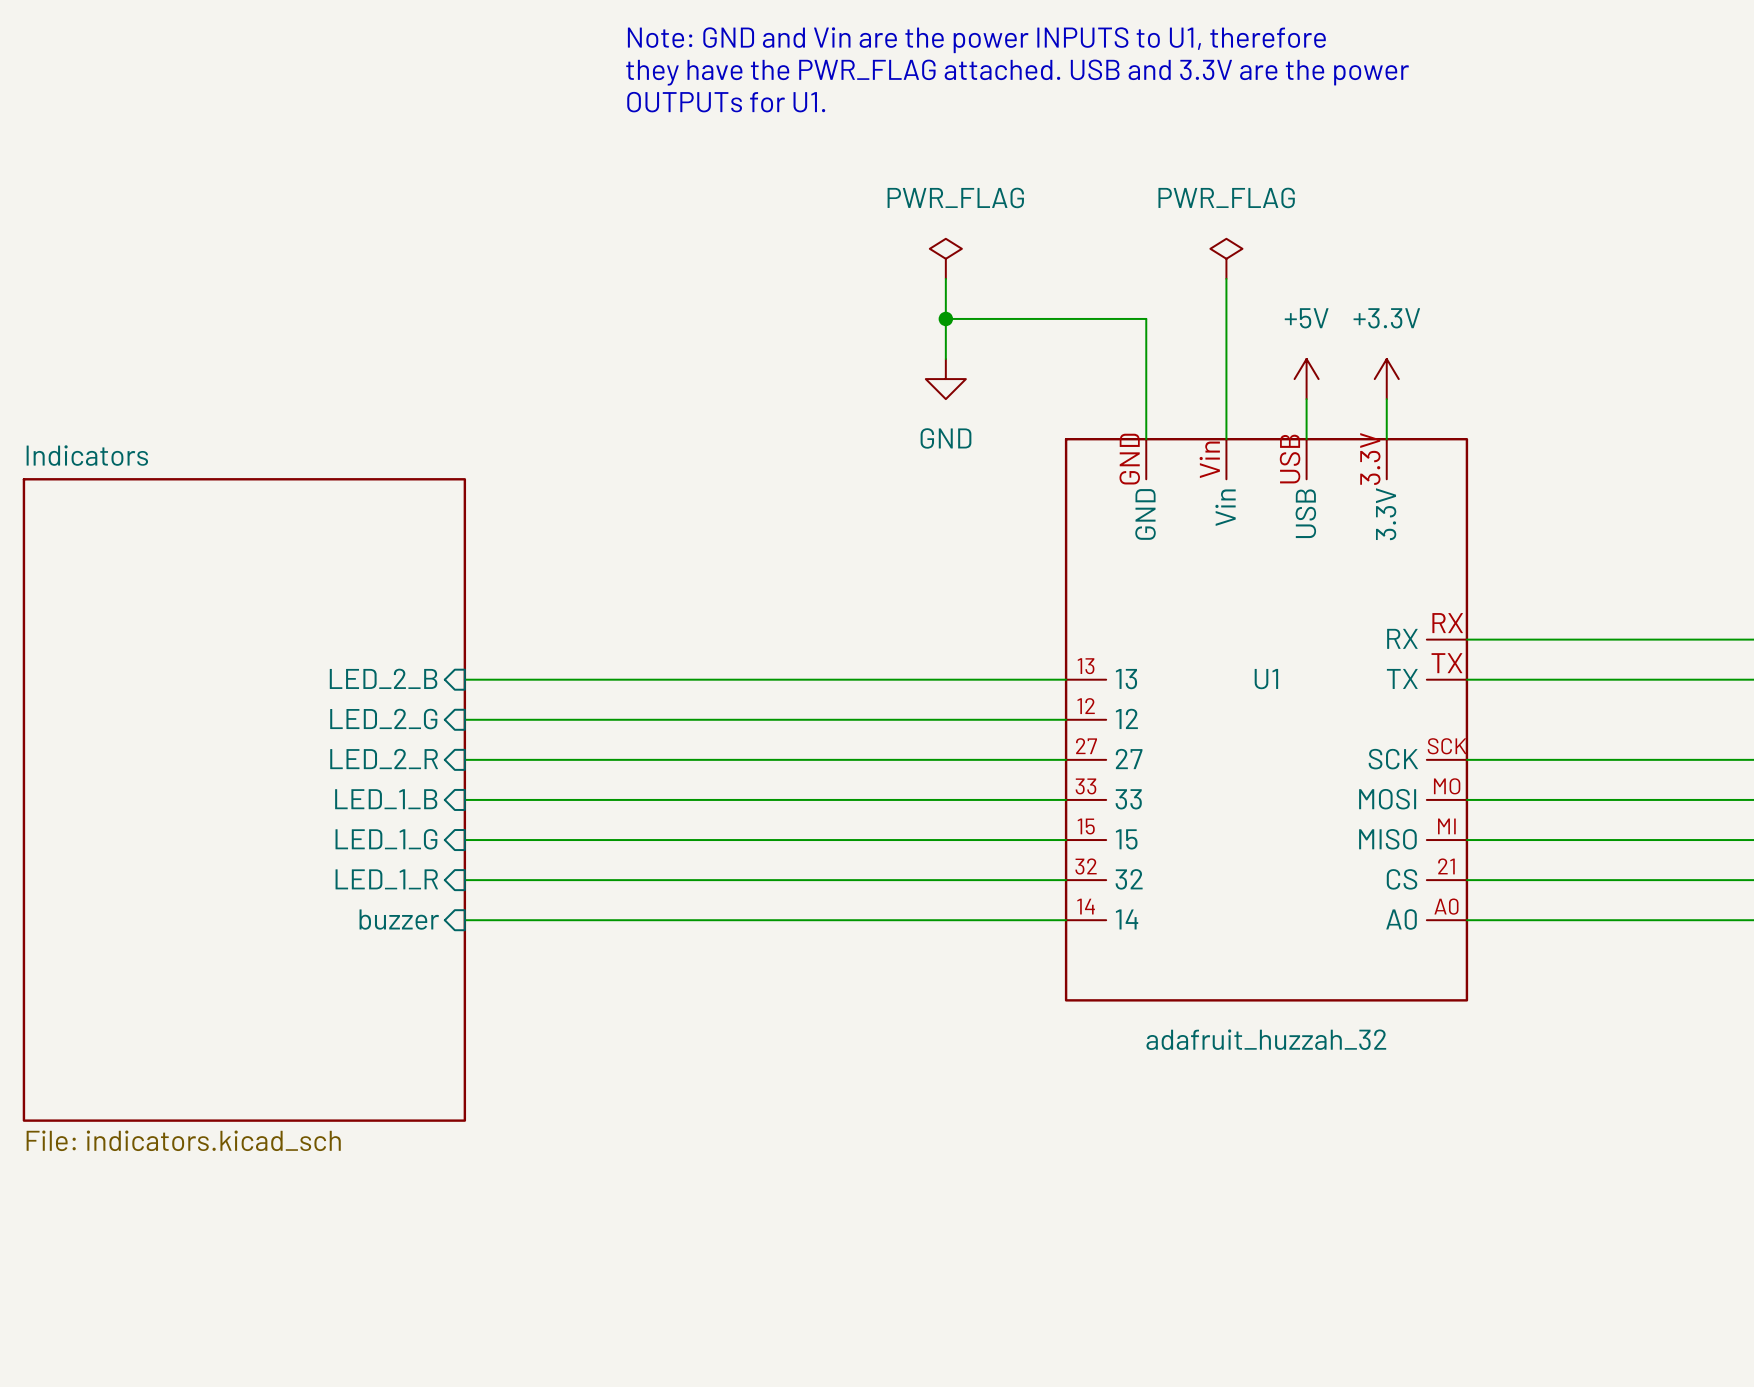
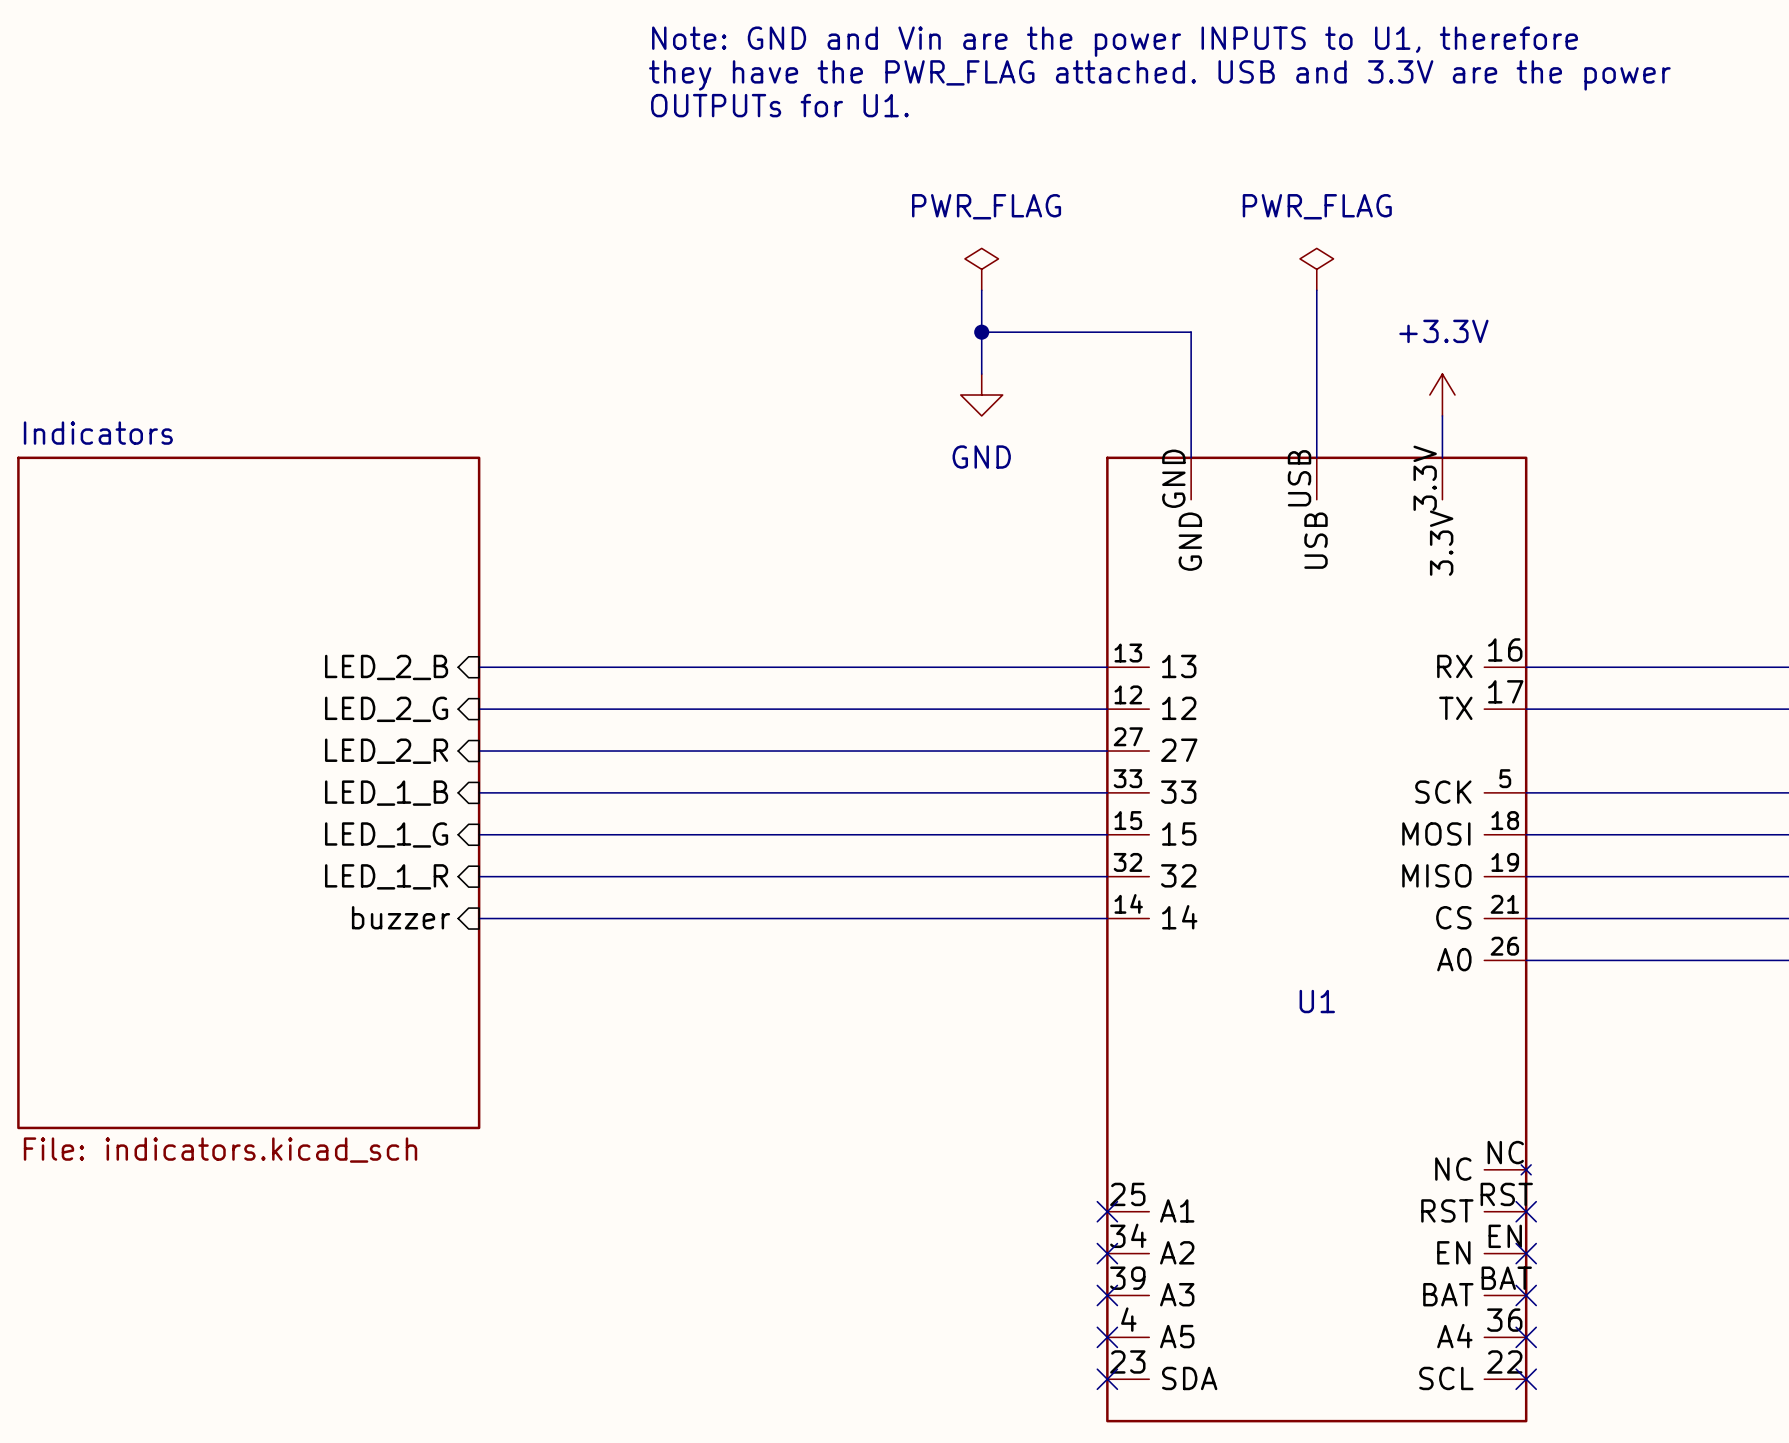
power symbol position: PWR_FLAG (1226, 258) -> PWR_FLAG (1316, 269)
wire: (1226, 278) (1226, 439) -> (1316, 290) (1316, 457)
power symbol: +5V (1306, 379) -> none
wire: (1306, 399) (1306, 439) -> none
U1 symbol: [1064, 438, 1469, 1002] -> [1106, 456, 1532, 1423]
sheet pin: none -> LED_2_B (386, 667)
sheet pin: LED_2_B (383, 678) -> LED_2_G (386, 709)
U1 name position: U1 (1266, 679) -> U1 (1317, 1001)
sheet pin: LED_2_G (383, 719) -> LED_2_R (386, 751)
sheet pin: LED_2_R (384, 759) -> LED_1_B (386, 793)
sheet Indicators position: (244, 799) -> (248, 792)
sheet pin: LED_1_B (386, 799) -> LED_1_G (386, 834)
sheet pin: LED_1_G (386, 839) -> LED_1_R (386, 876)
sheet pin: LED_1_R (386, 879) -> buzzer (401, 917)
sheet pin: buzzer (399, 919) -> none
wire: (464, 920) (1066, 920) -> (479, 667) (1107, 667)
U1 value: adafruit_huzzah_32 (1266, 1039) -> none
no-connect mark: none -> (1107, 1211)
no-connect mark: none -> (1526, 1211)
no-connect mark: none -> (1107, 1253)
no-connect mark: none -> (1526, 1253)
no-connect mark: none -> (1107, 1295)
no-connect mark: none -> (1526, 1295)
no-connect mark: none -> (1107, 1337)
no-connect mark: none -> (1526, 1337)
no-connect mark: none -> (1107, 1379)
no-connect mark: none -> (1526, 1379)

